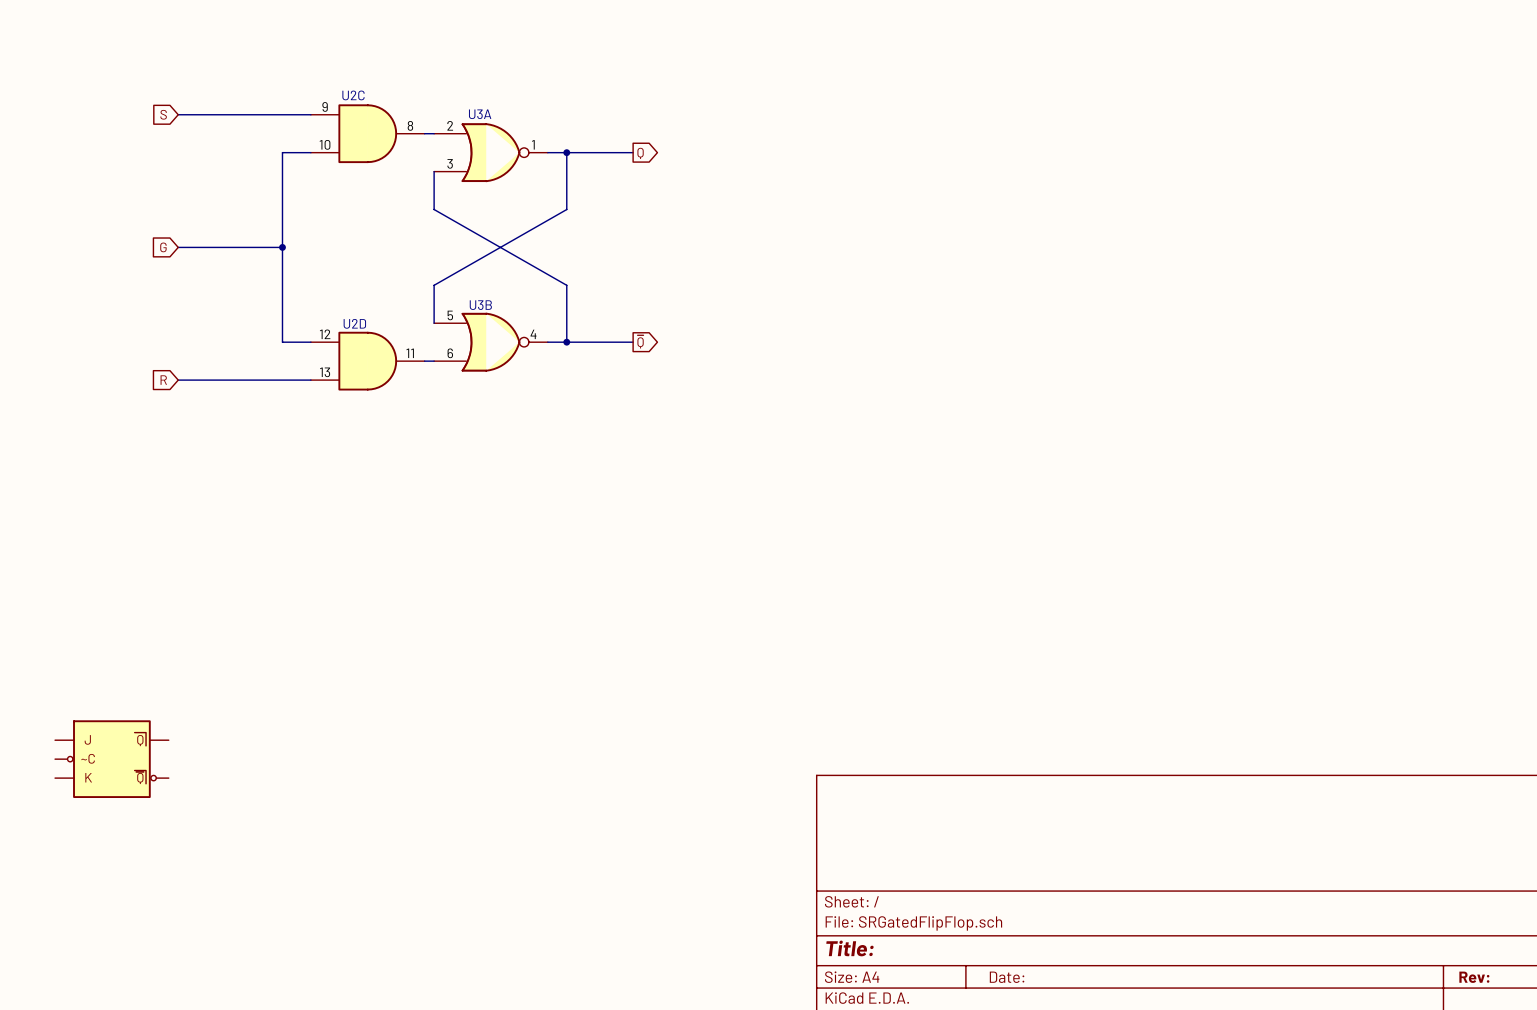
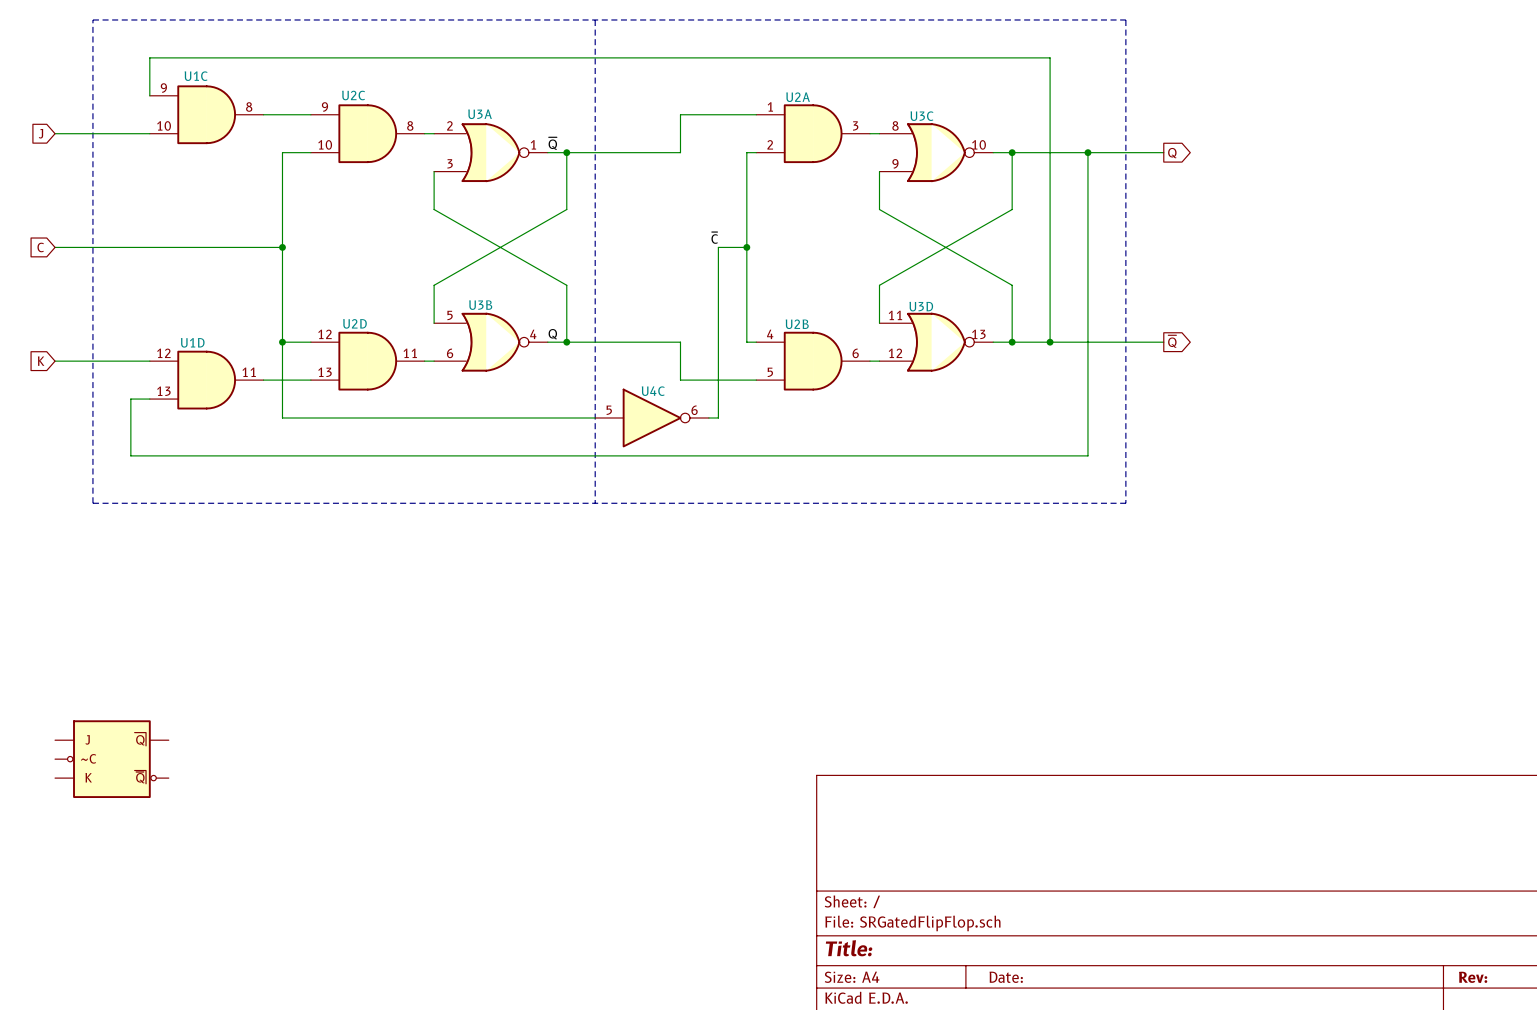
line: none -> (92, 19) (92, 503) (1125, 503) (1125, 19) (92, 19)
line: none -> (595, 19) (595, 503)
wire: none -> (149, 95) (149, 57) (1050, 57) (1050, 342)
global label: S (163, 114) -> none
U1C: none -> (206, 114)
wire: none -> (756, 114) (680, 114) (680, 152) (633, 152)
global label: none -> J (40, 133)
wire: none -> (55, 133) (149, 133)
U2A: none -> (813, 133)
wire: none -> (870, 133) (879, 133)
label: none -> ~{Q} (552, 143)
wire: none -> (756, 152) (746, 152) (746, 342) (756, 342)
U3C: none -> (936, 152)
wire: none -> (993, 152) (1163, 152)
wire: none -> (1012, 152) (1012, 209) (879, 285) (879, 323)
junction: none -> (1012, 152)
wire: none -> (1087, 152) (1087, 455) (130, 455) (130, 399) (149, 399)
junction: none -> (1087, 152)
global label: Q (640, 153) -> none
global label: none -> Q (1172, 153)
wire: none -> (879, 171) (879, 209) (1012, 285) (1012, 342)
label: none -> ~{C} (714, 237)
global label: none -> C (40, 247)
wire: none -> (55, 247) (178, 247)
global label: G (163, 247) -> none
wire: none -> (746, 247) (718, 247) (718, 417) (708, 417)
junction: none -> (746, 247)
label: none -> Q (552, 334)
global label: ~{Q} (640, 341) -> none
global label: none -> ~{Q} (1172, 341)
wire: none -> (282, 342) (282, 417) (595, 417)
junction: none -> (282, 342)
wire: none -> (633, 342) (680, 342) (680, 380) (756, 380)
U3D: none -> (936, 342)
wire: none -> (993, 342) (1163, 342)
junction: none -> (1012, 342)
junction: none -> (1050, 342)
global label: none -> K (41, 361)
wire: none -> (55, 361) (149, 361)
U2B: none -> (813, 361)
wire: none -> (870, 361) (879, 361)
global label: R (163, 380) -> none
U1D: none -> (206, 380)
U4C: none -> (652, 417)

